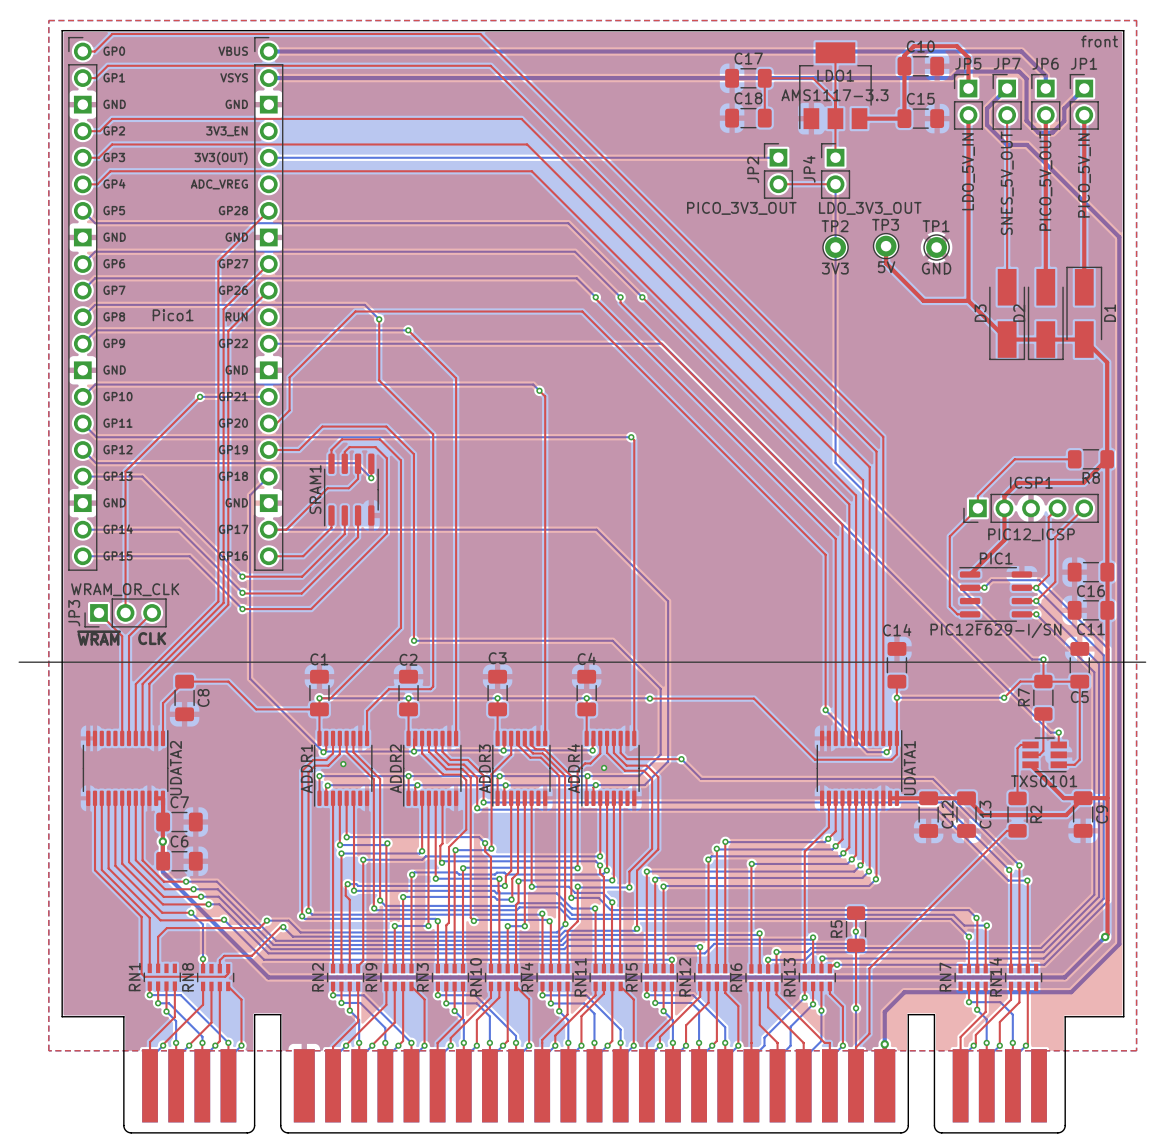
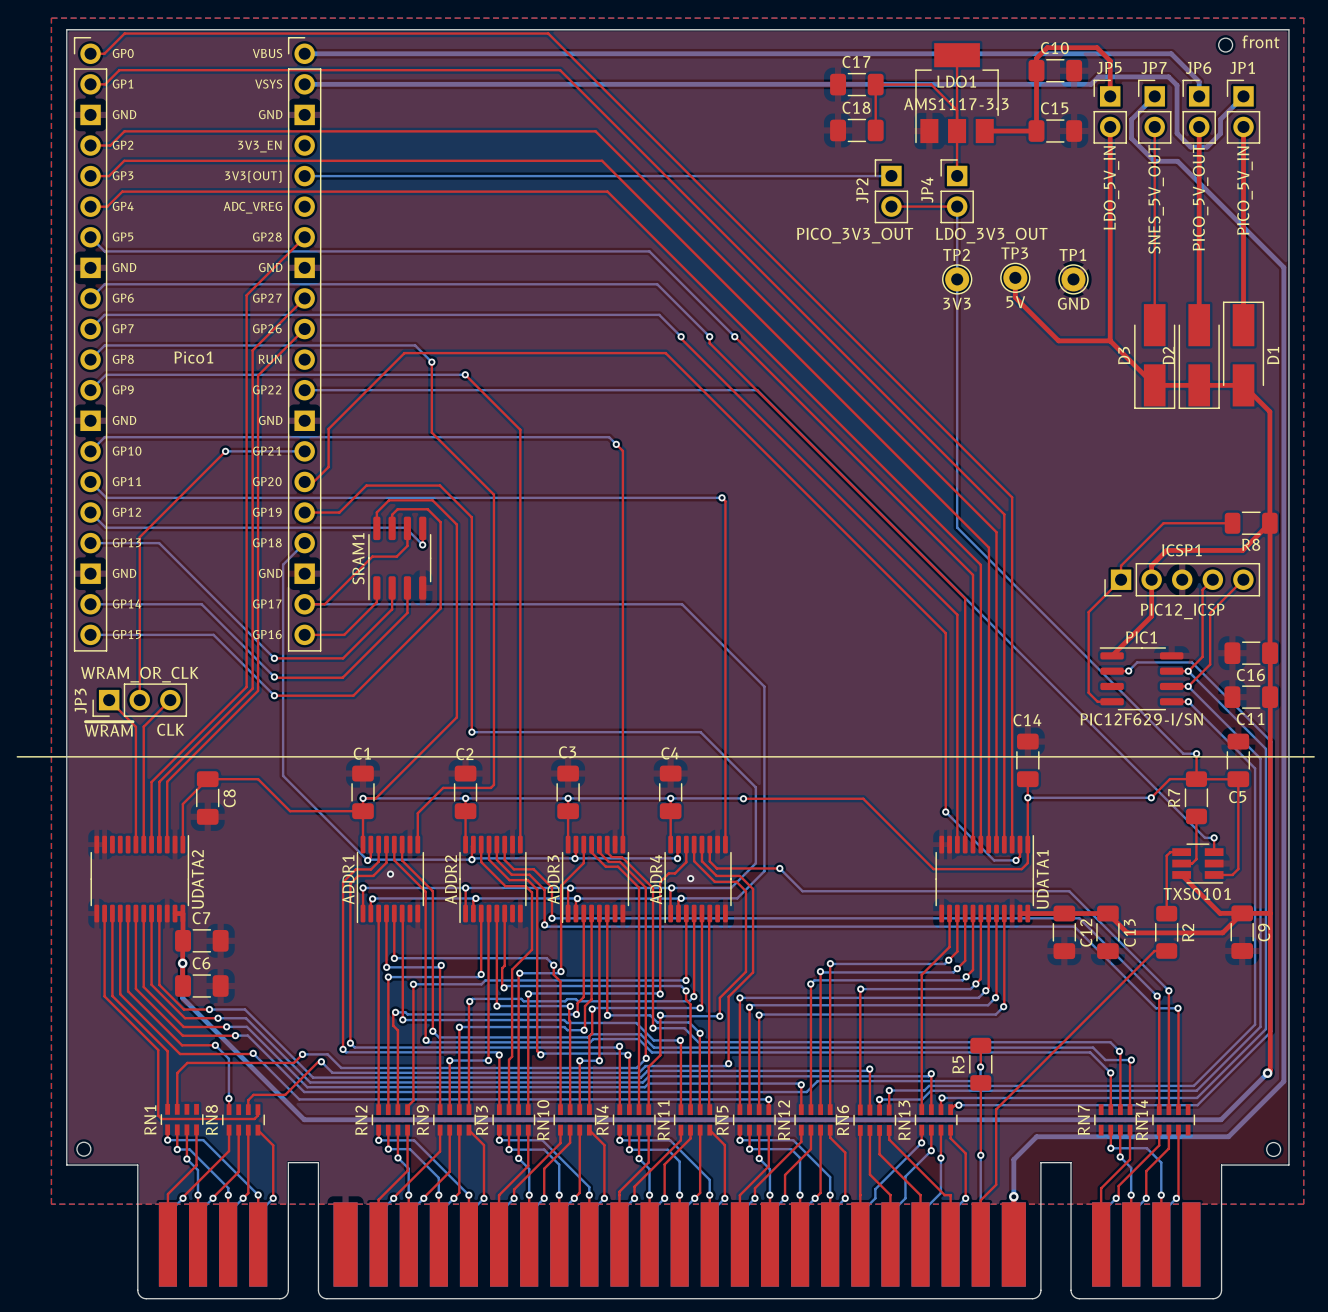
part footprint: [18, 30, 1147, 1134] -> [16, 29, 1315, 1300]

